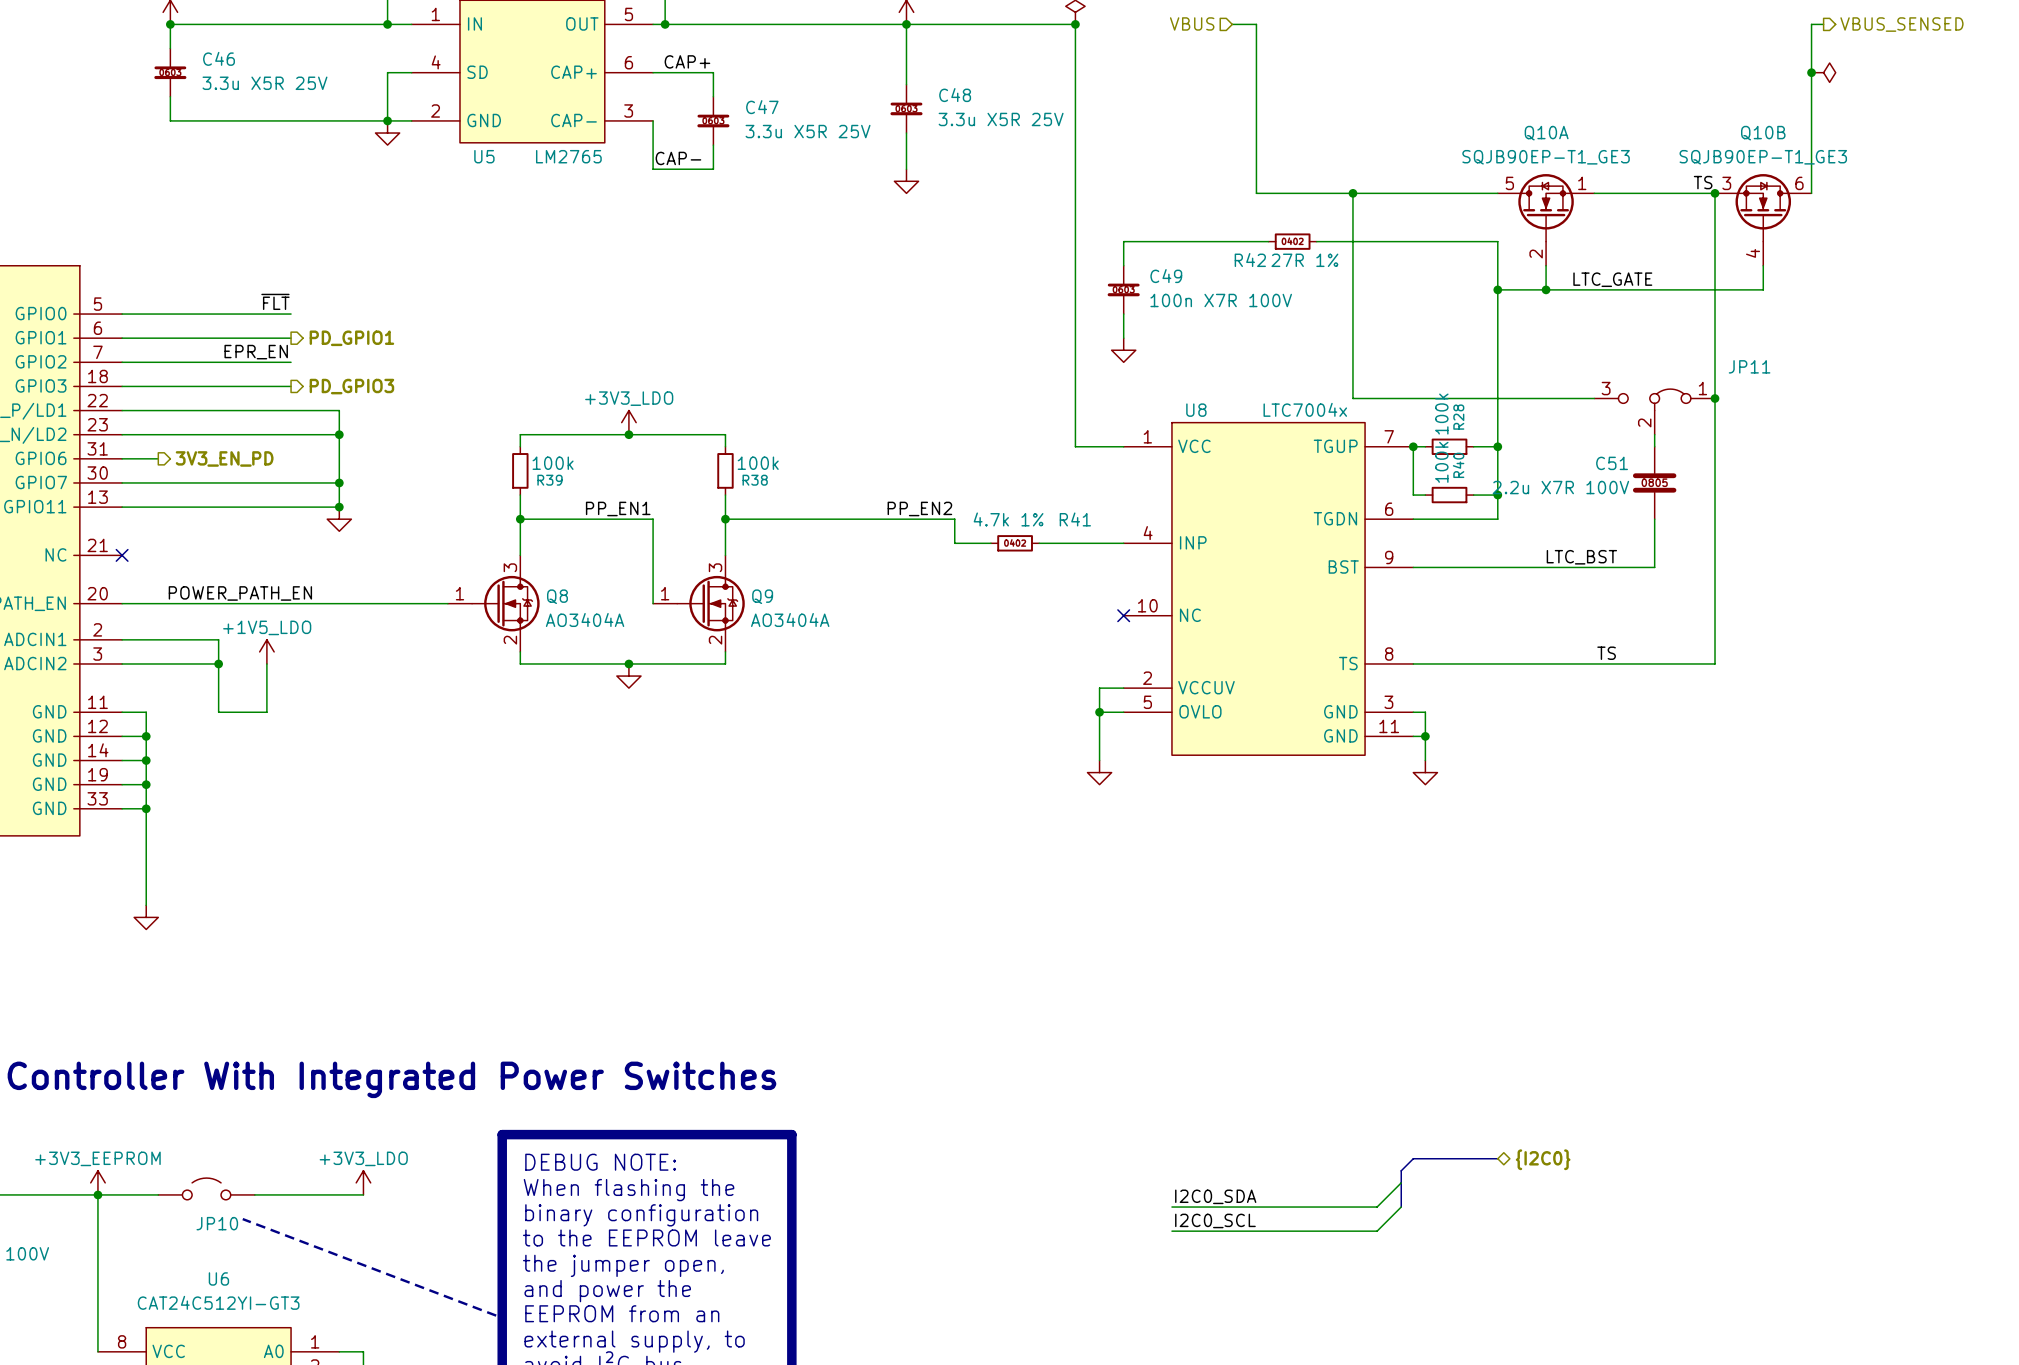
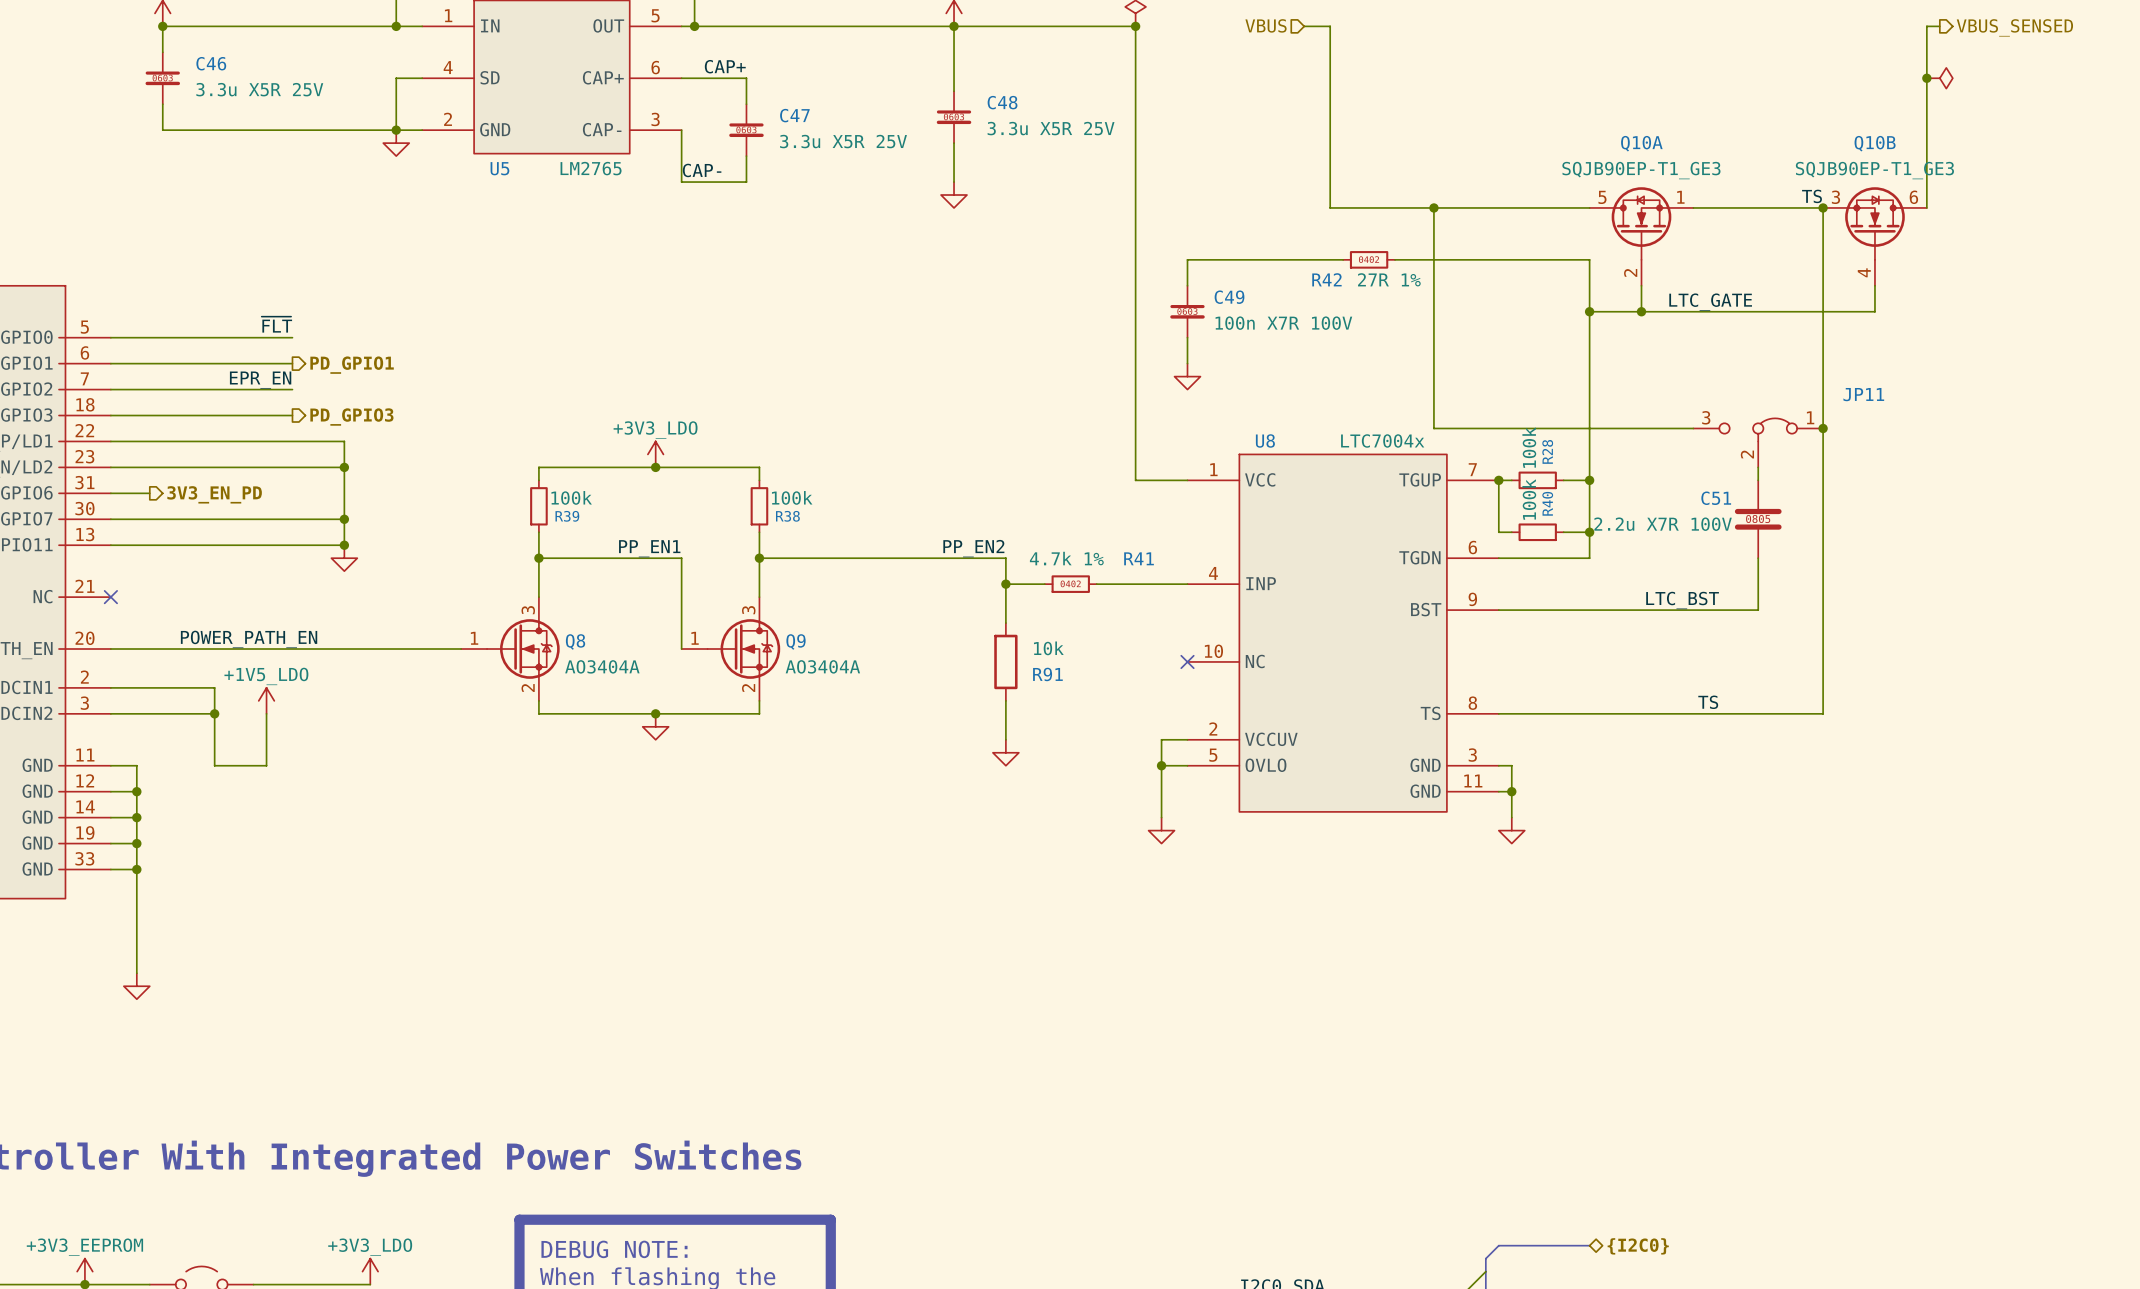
wire: none -> (1005, 584) (1005, 623)
junction: none -> (1005, 584)
R91: none -> 10k (1005, 661)
wire: none -> (1005, 700) (1005, 739)
power symbol: none -> (1005, 752)

